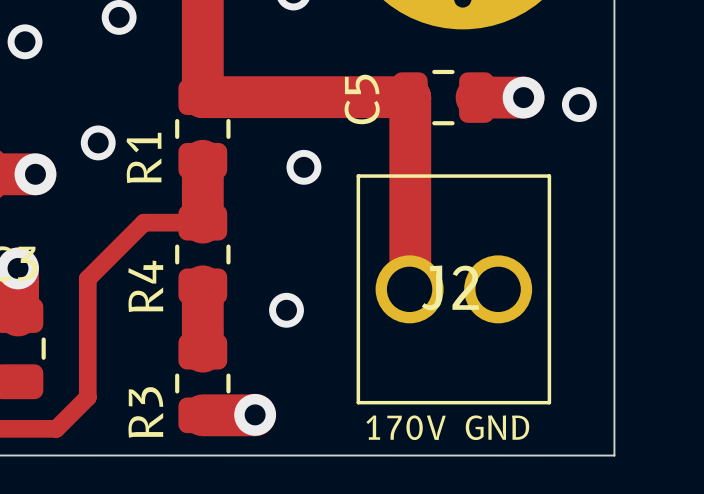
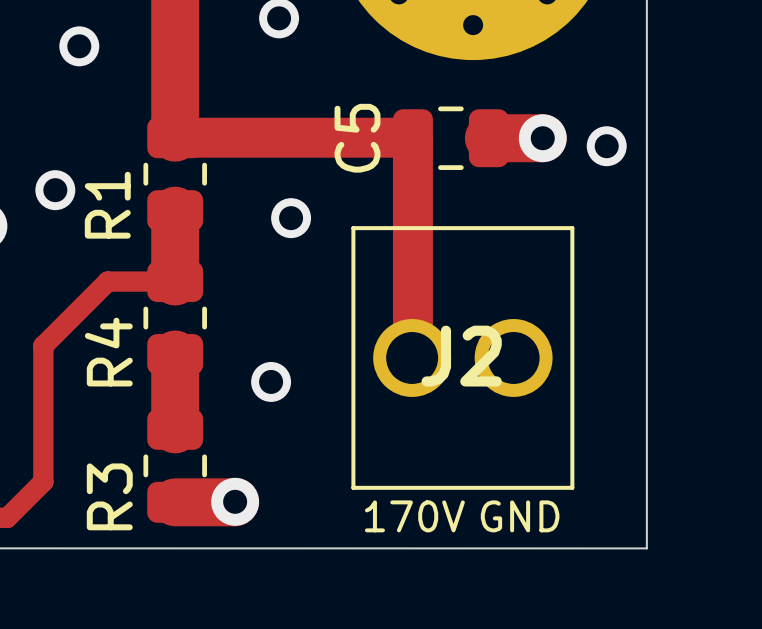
track width: thick (202, 97) (409, 97) -> thin (175, 137) (412, 137)
track width: thick (410, 97) (410, 288) -> thin (412, 138) (412, 357)

